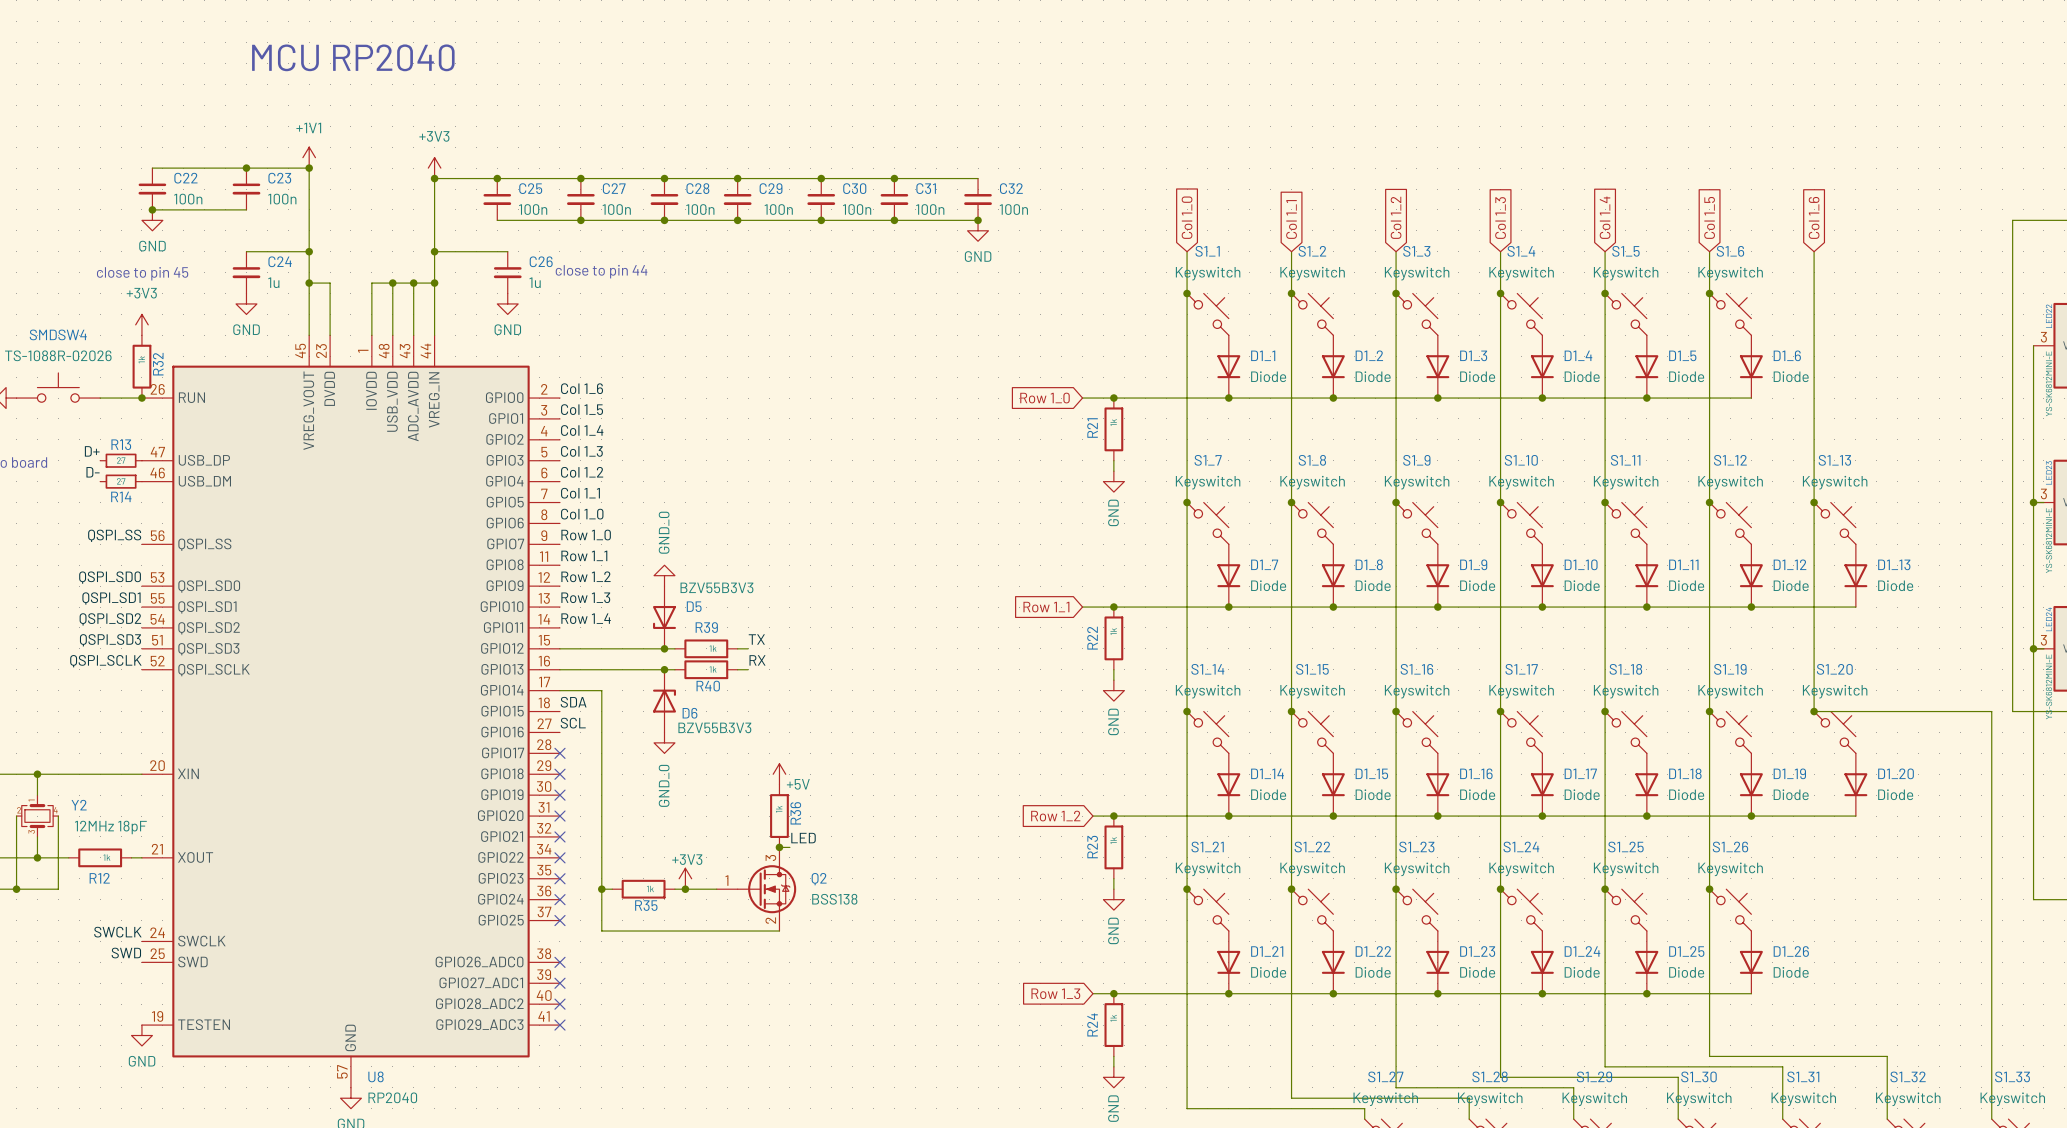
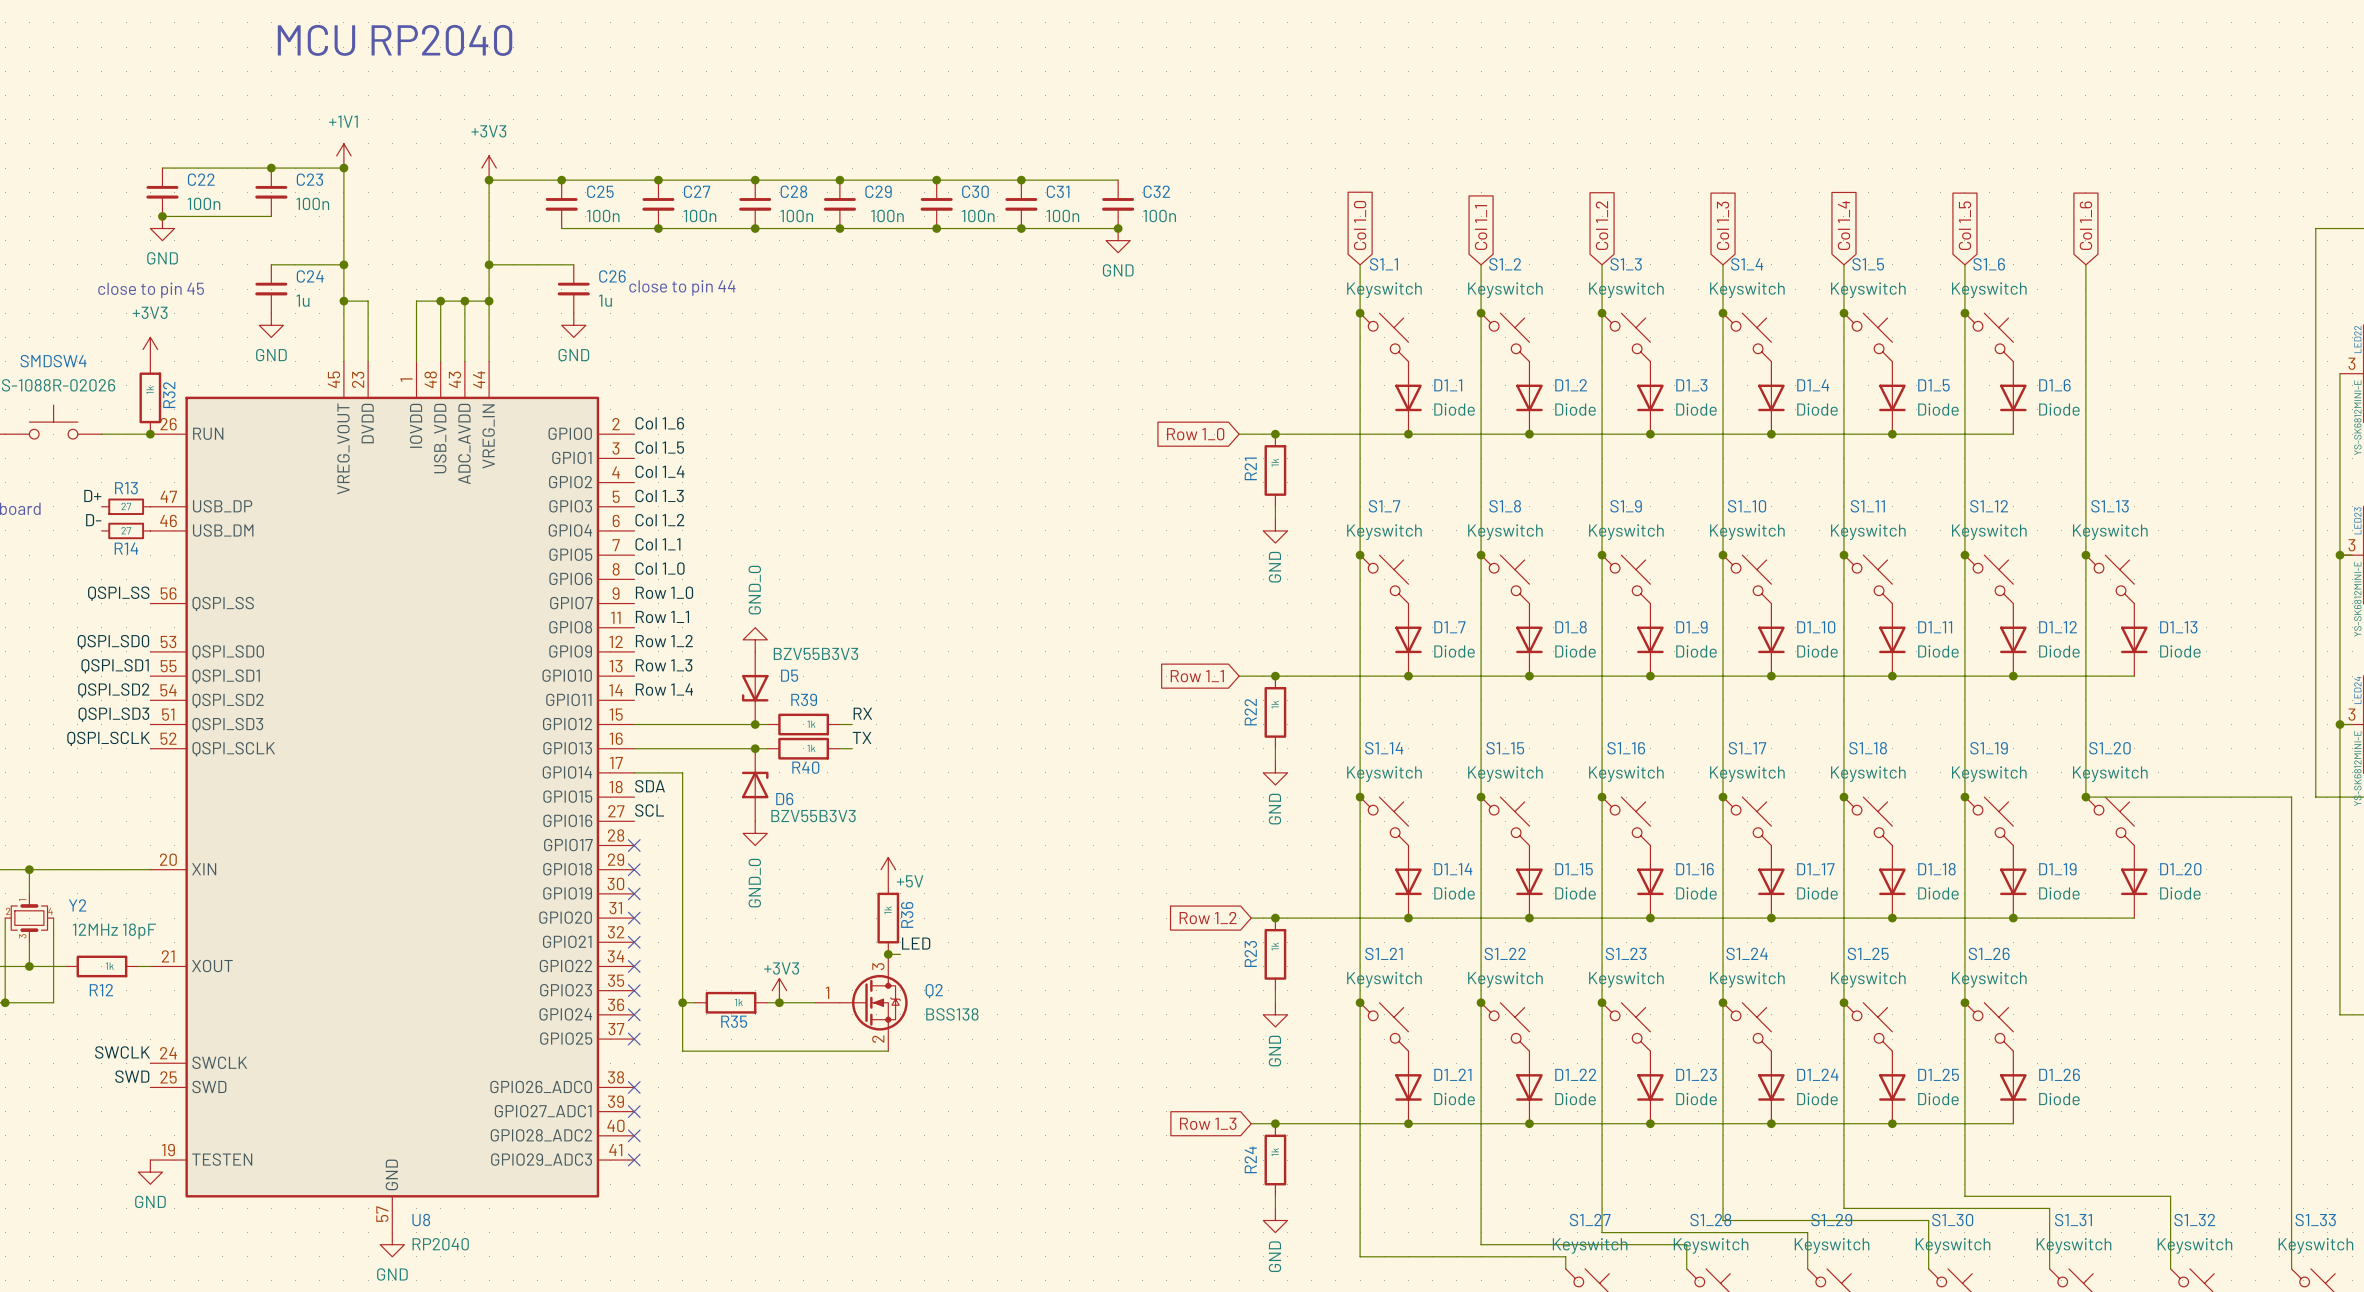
label: TX (756, 639) -> RX (862, 713)
label: RX (757, 660) -> TX (862, 737)

